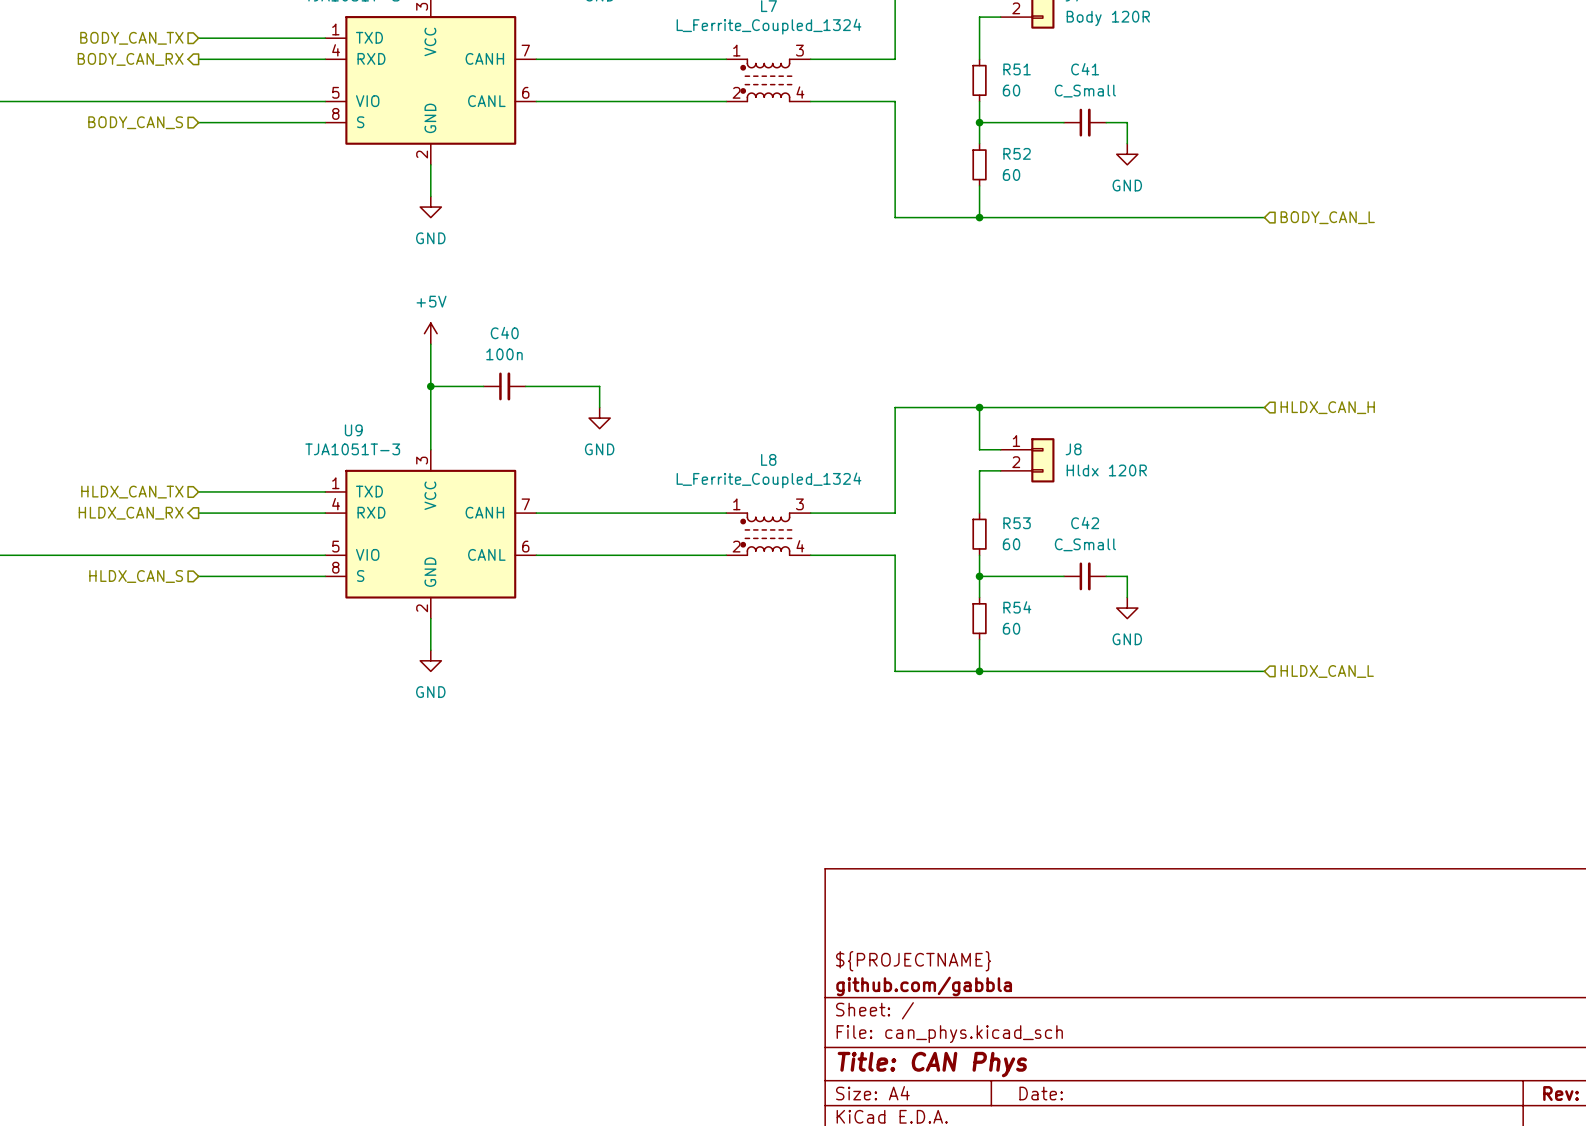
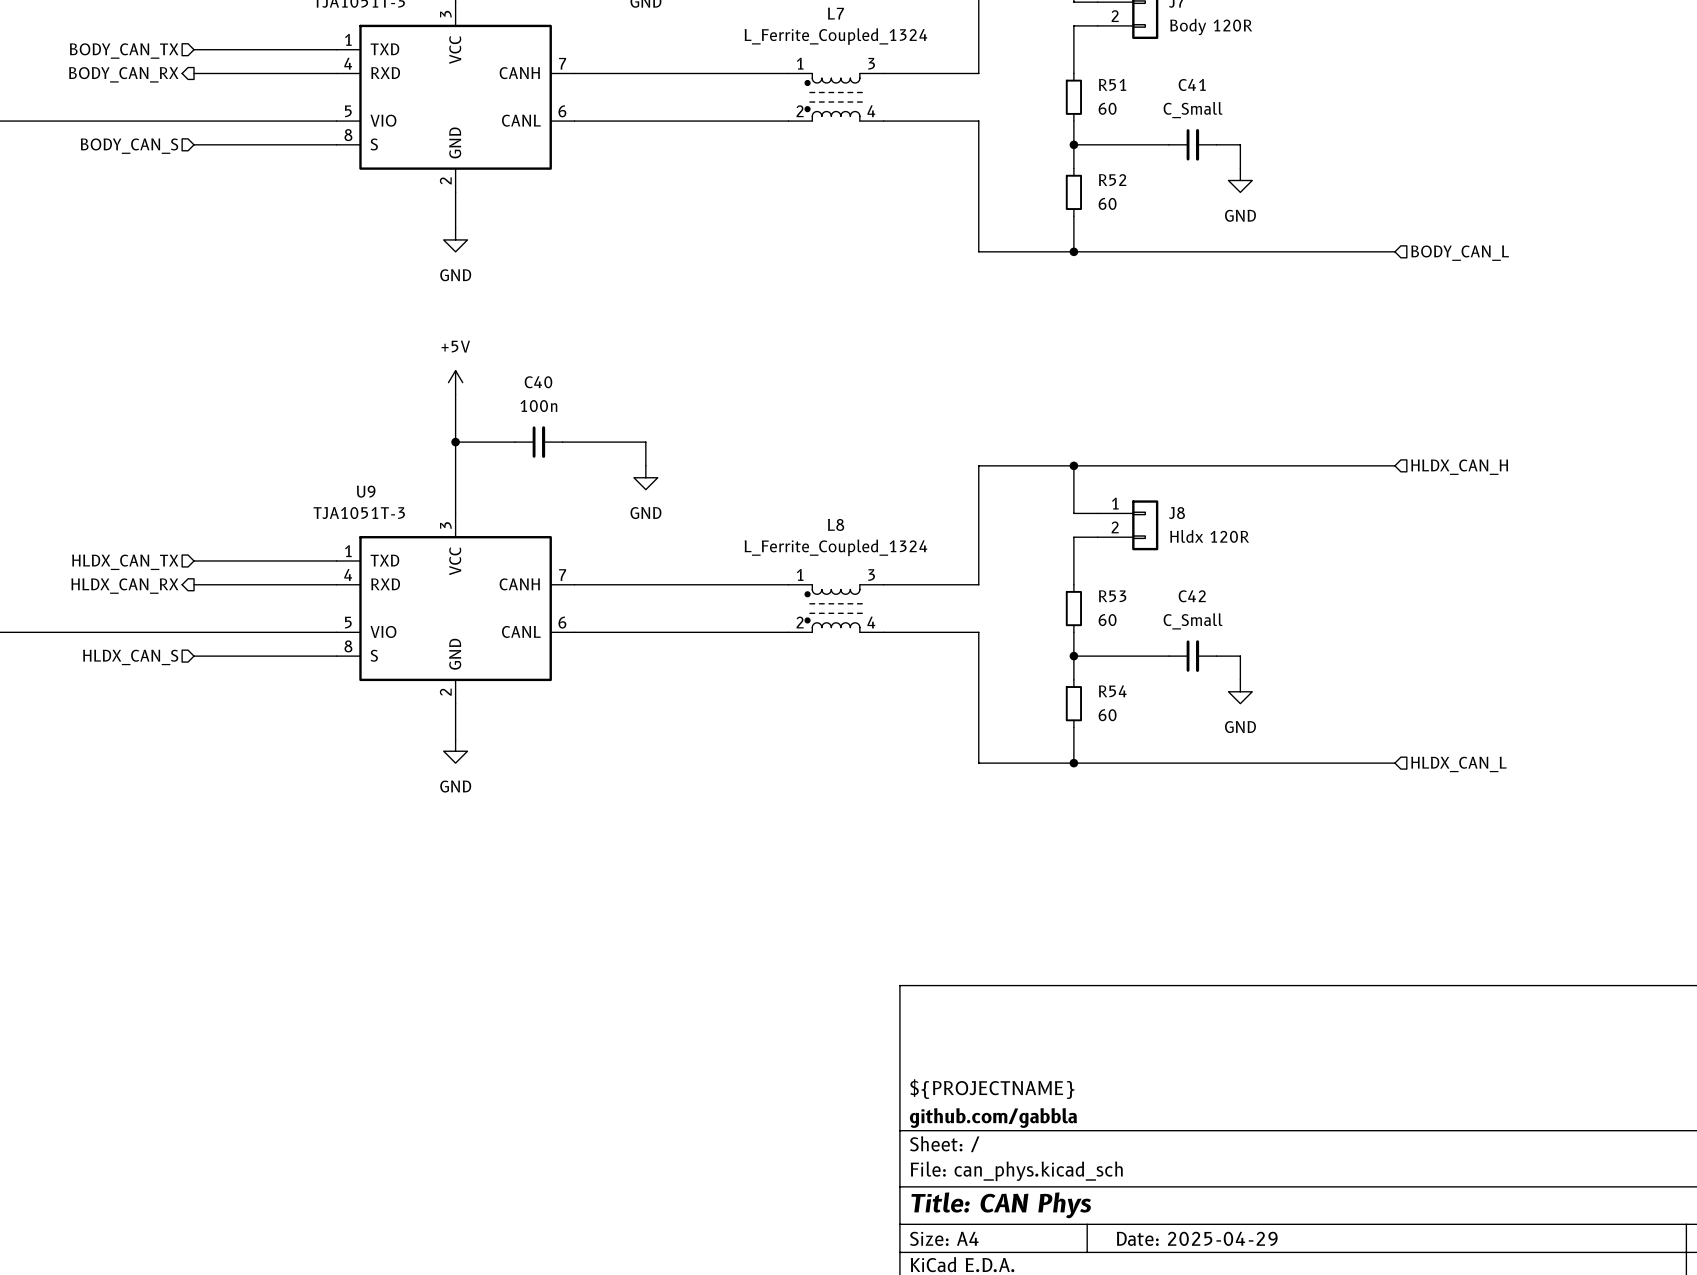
title block: Date: (1041, 1093) -> Date: 2025-04-29 (1197, 1238)

